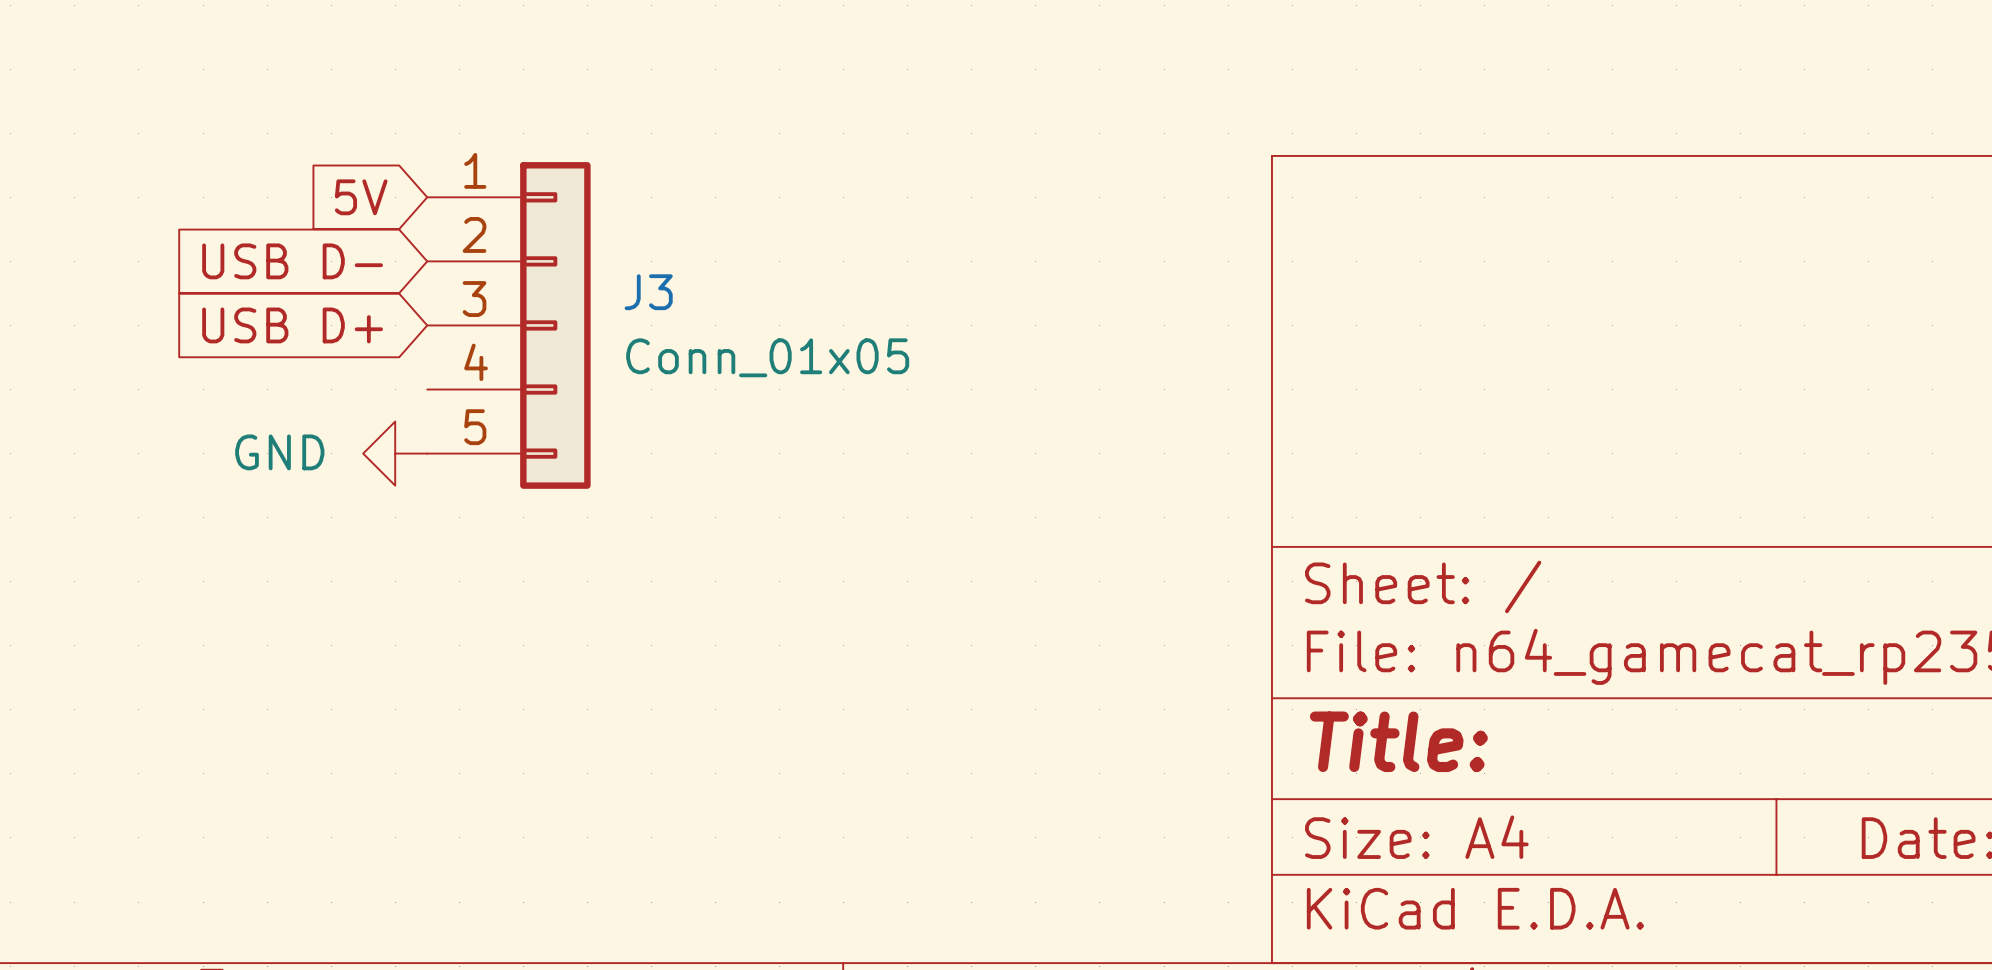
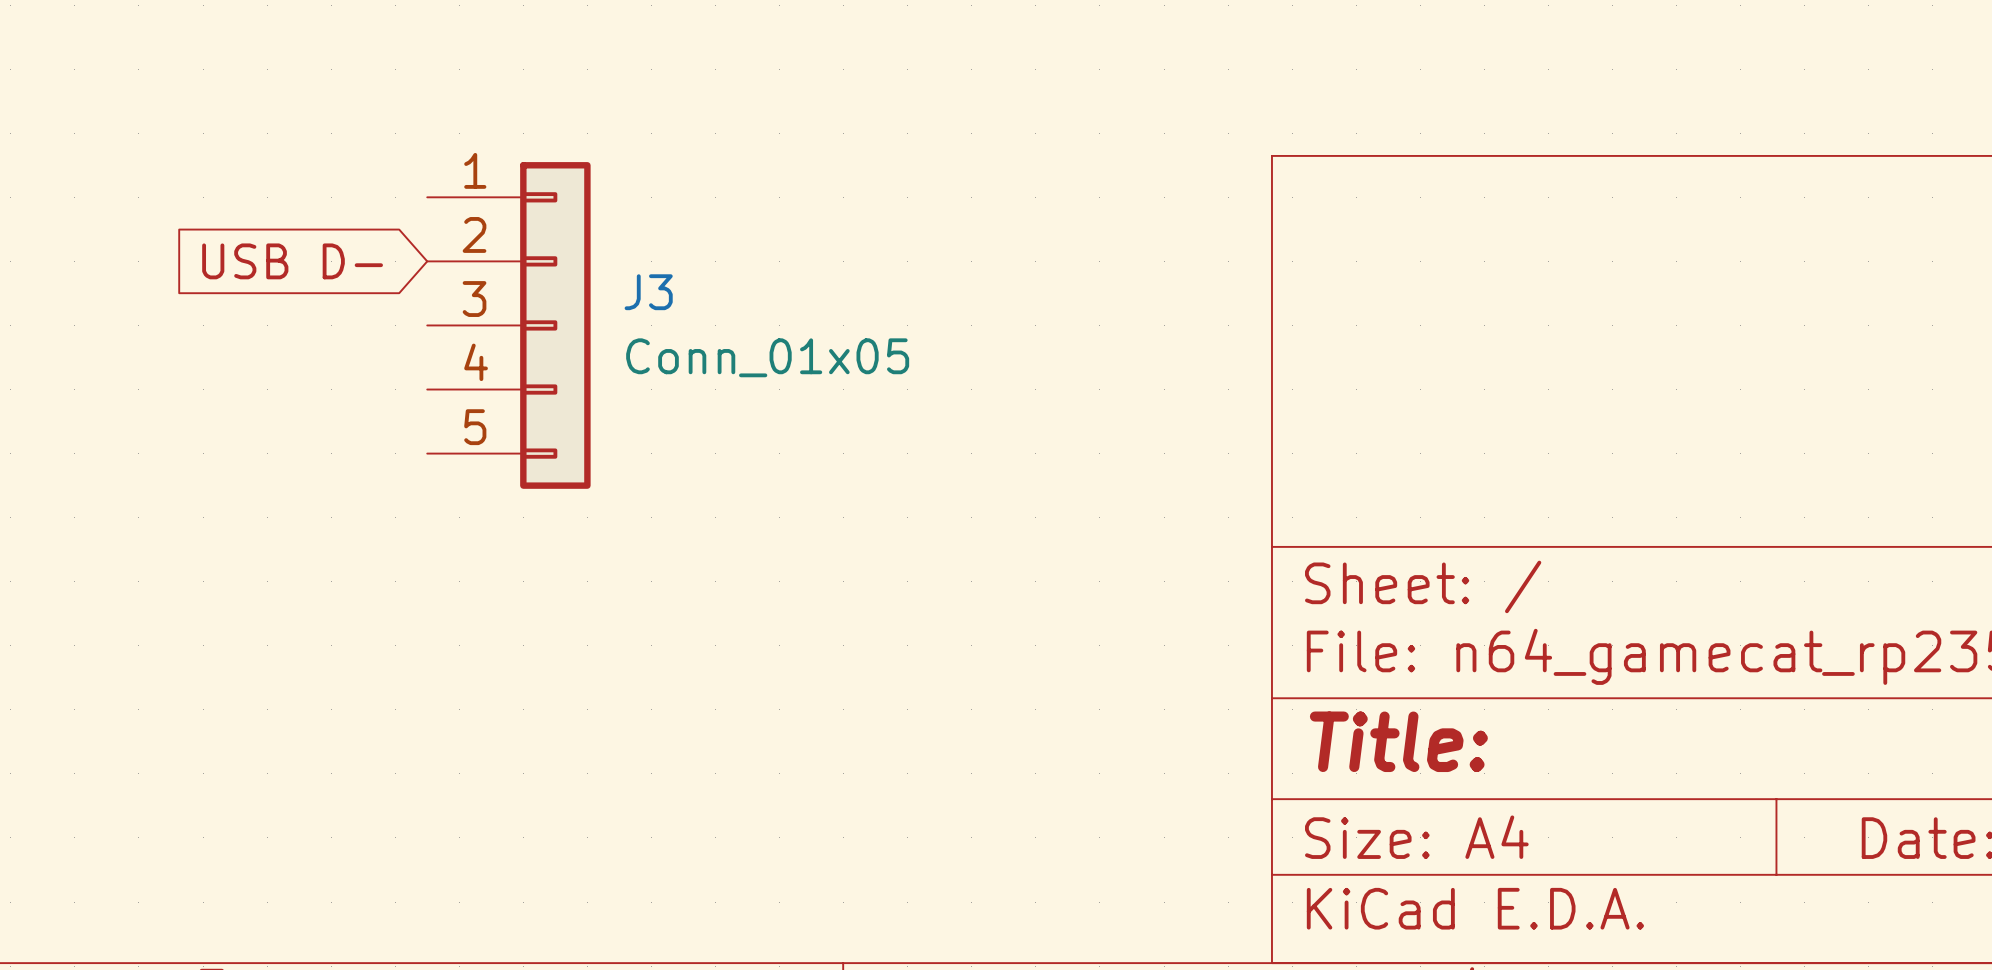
global label: 5V (361, 197) -> none
global label: USB D+ (292, 325) -> none
power symbol: GND (395, 453) -> none

